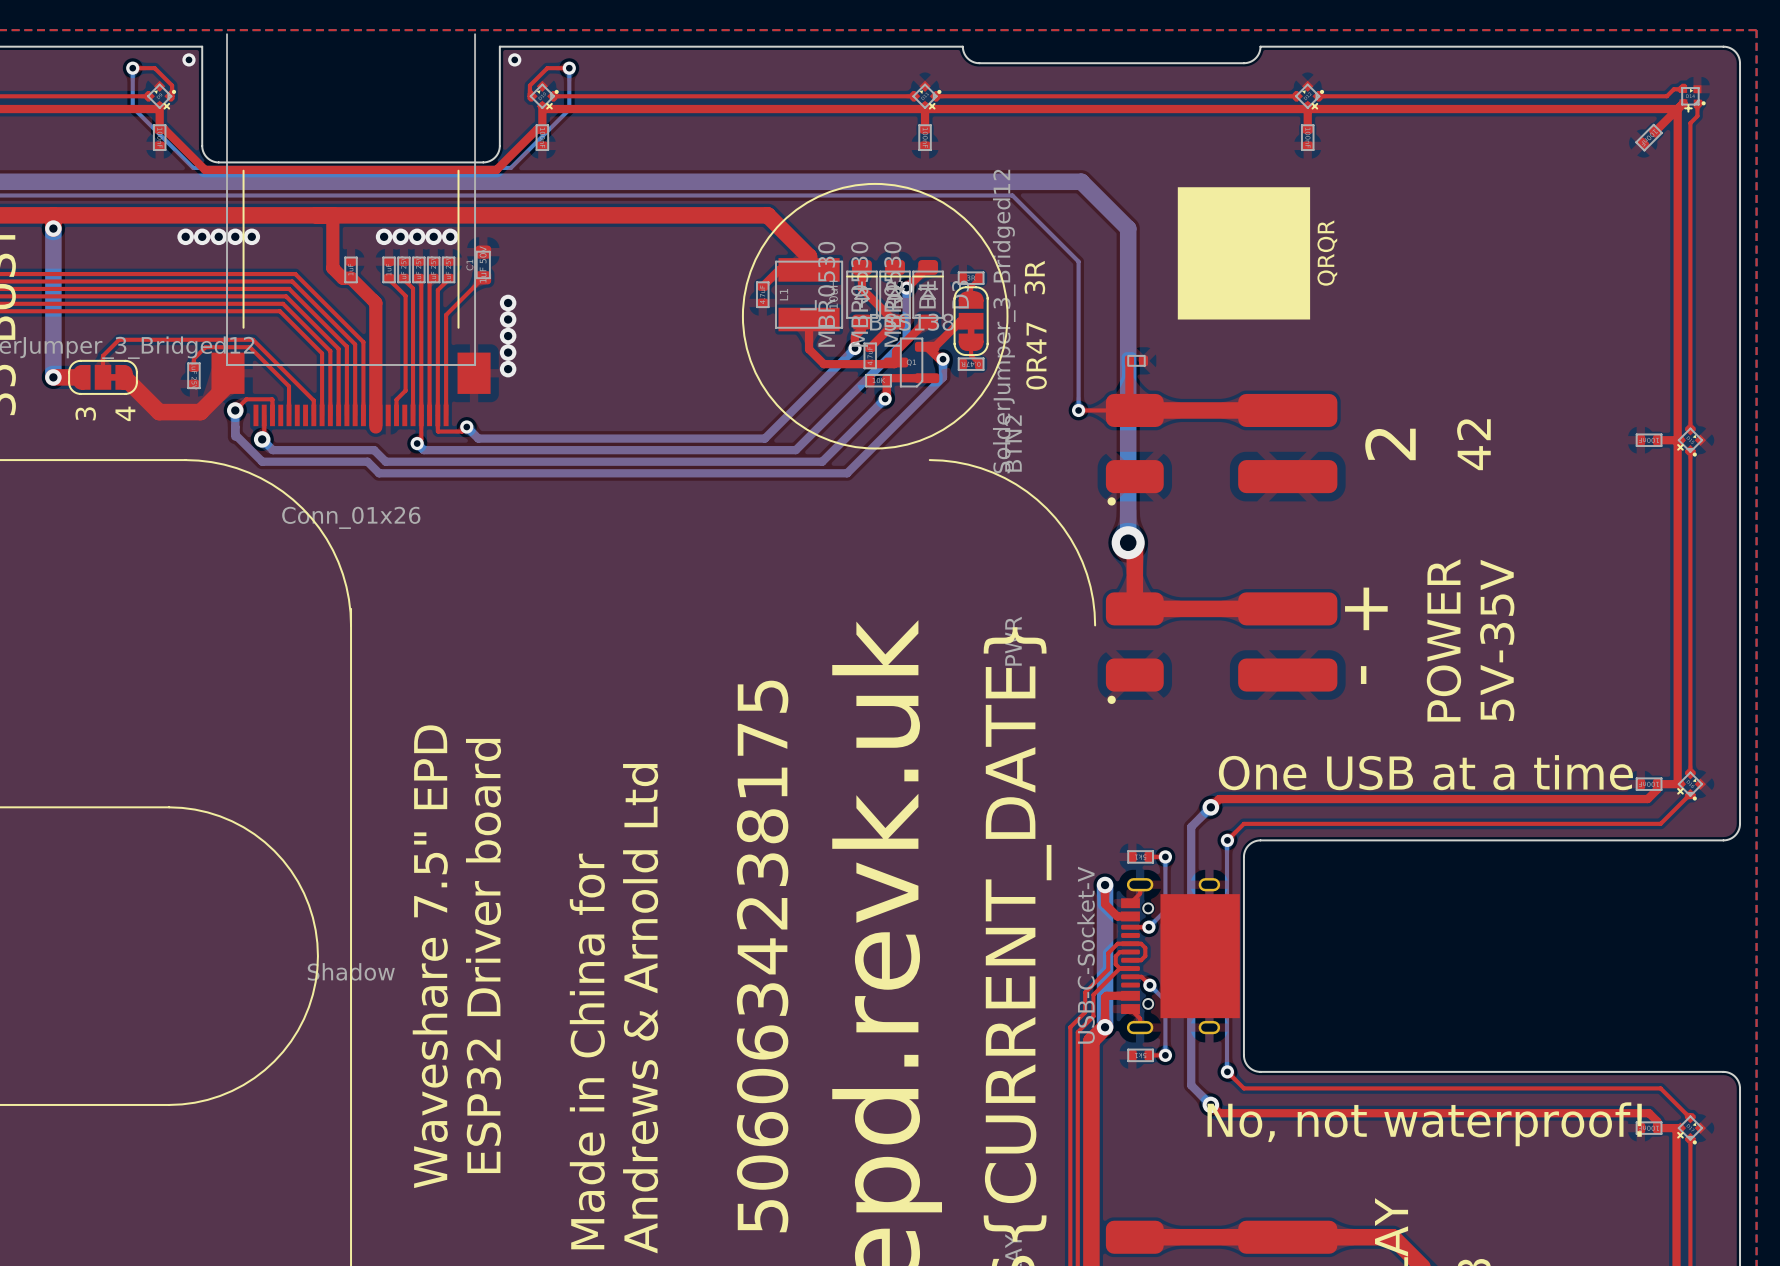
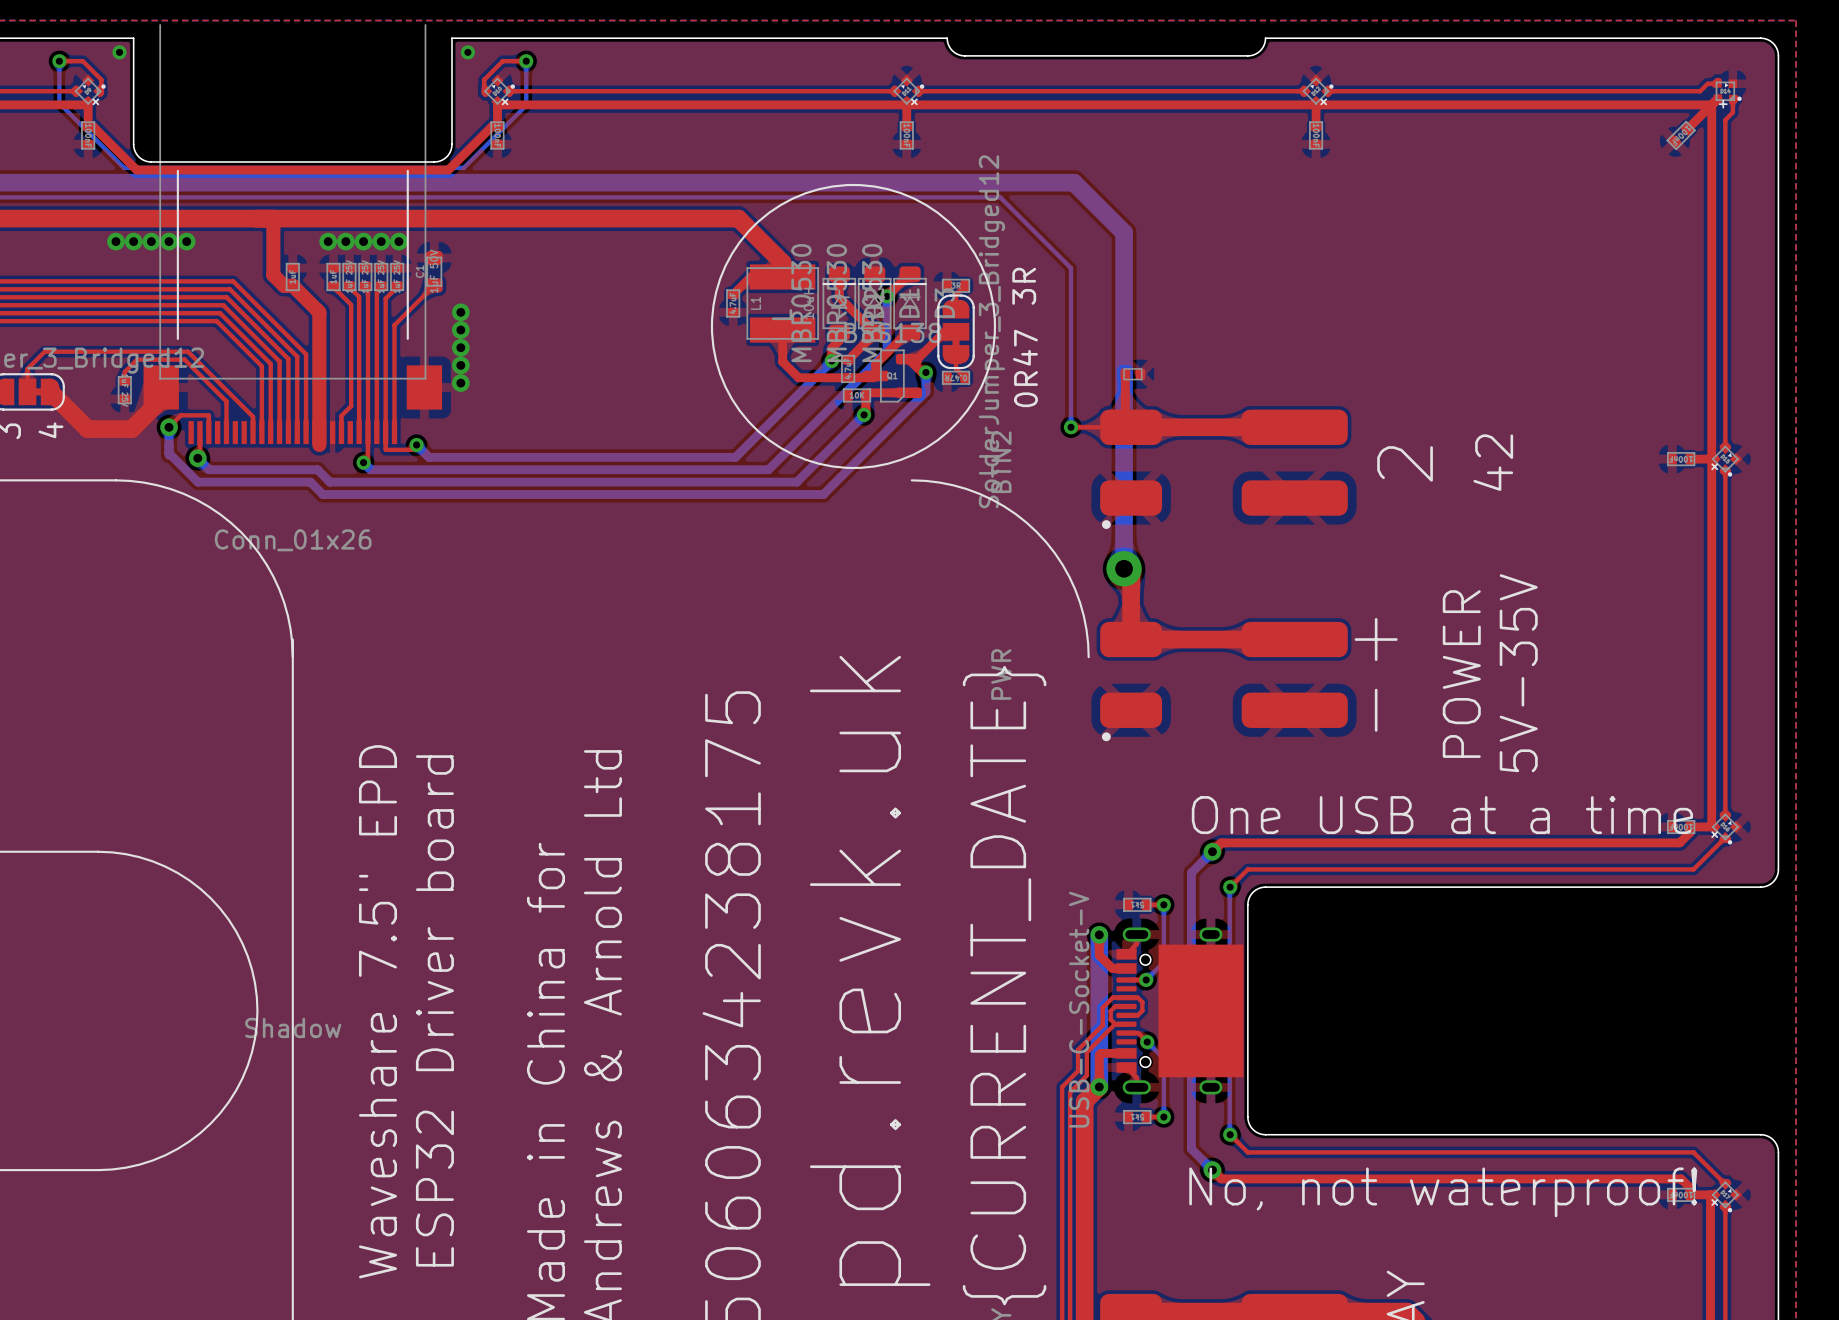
drawing: [1177, 187, 1311, 320] -> none
text: QRQR (1327, 253) -> none

